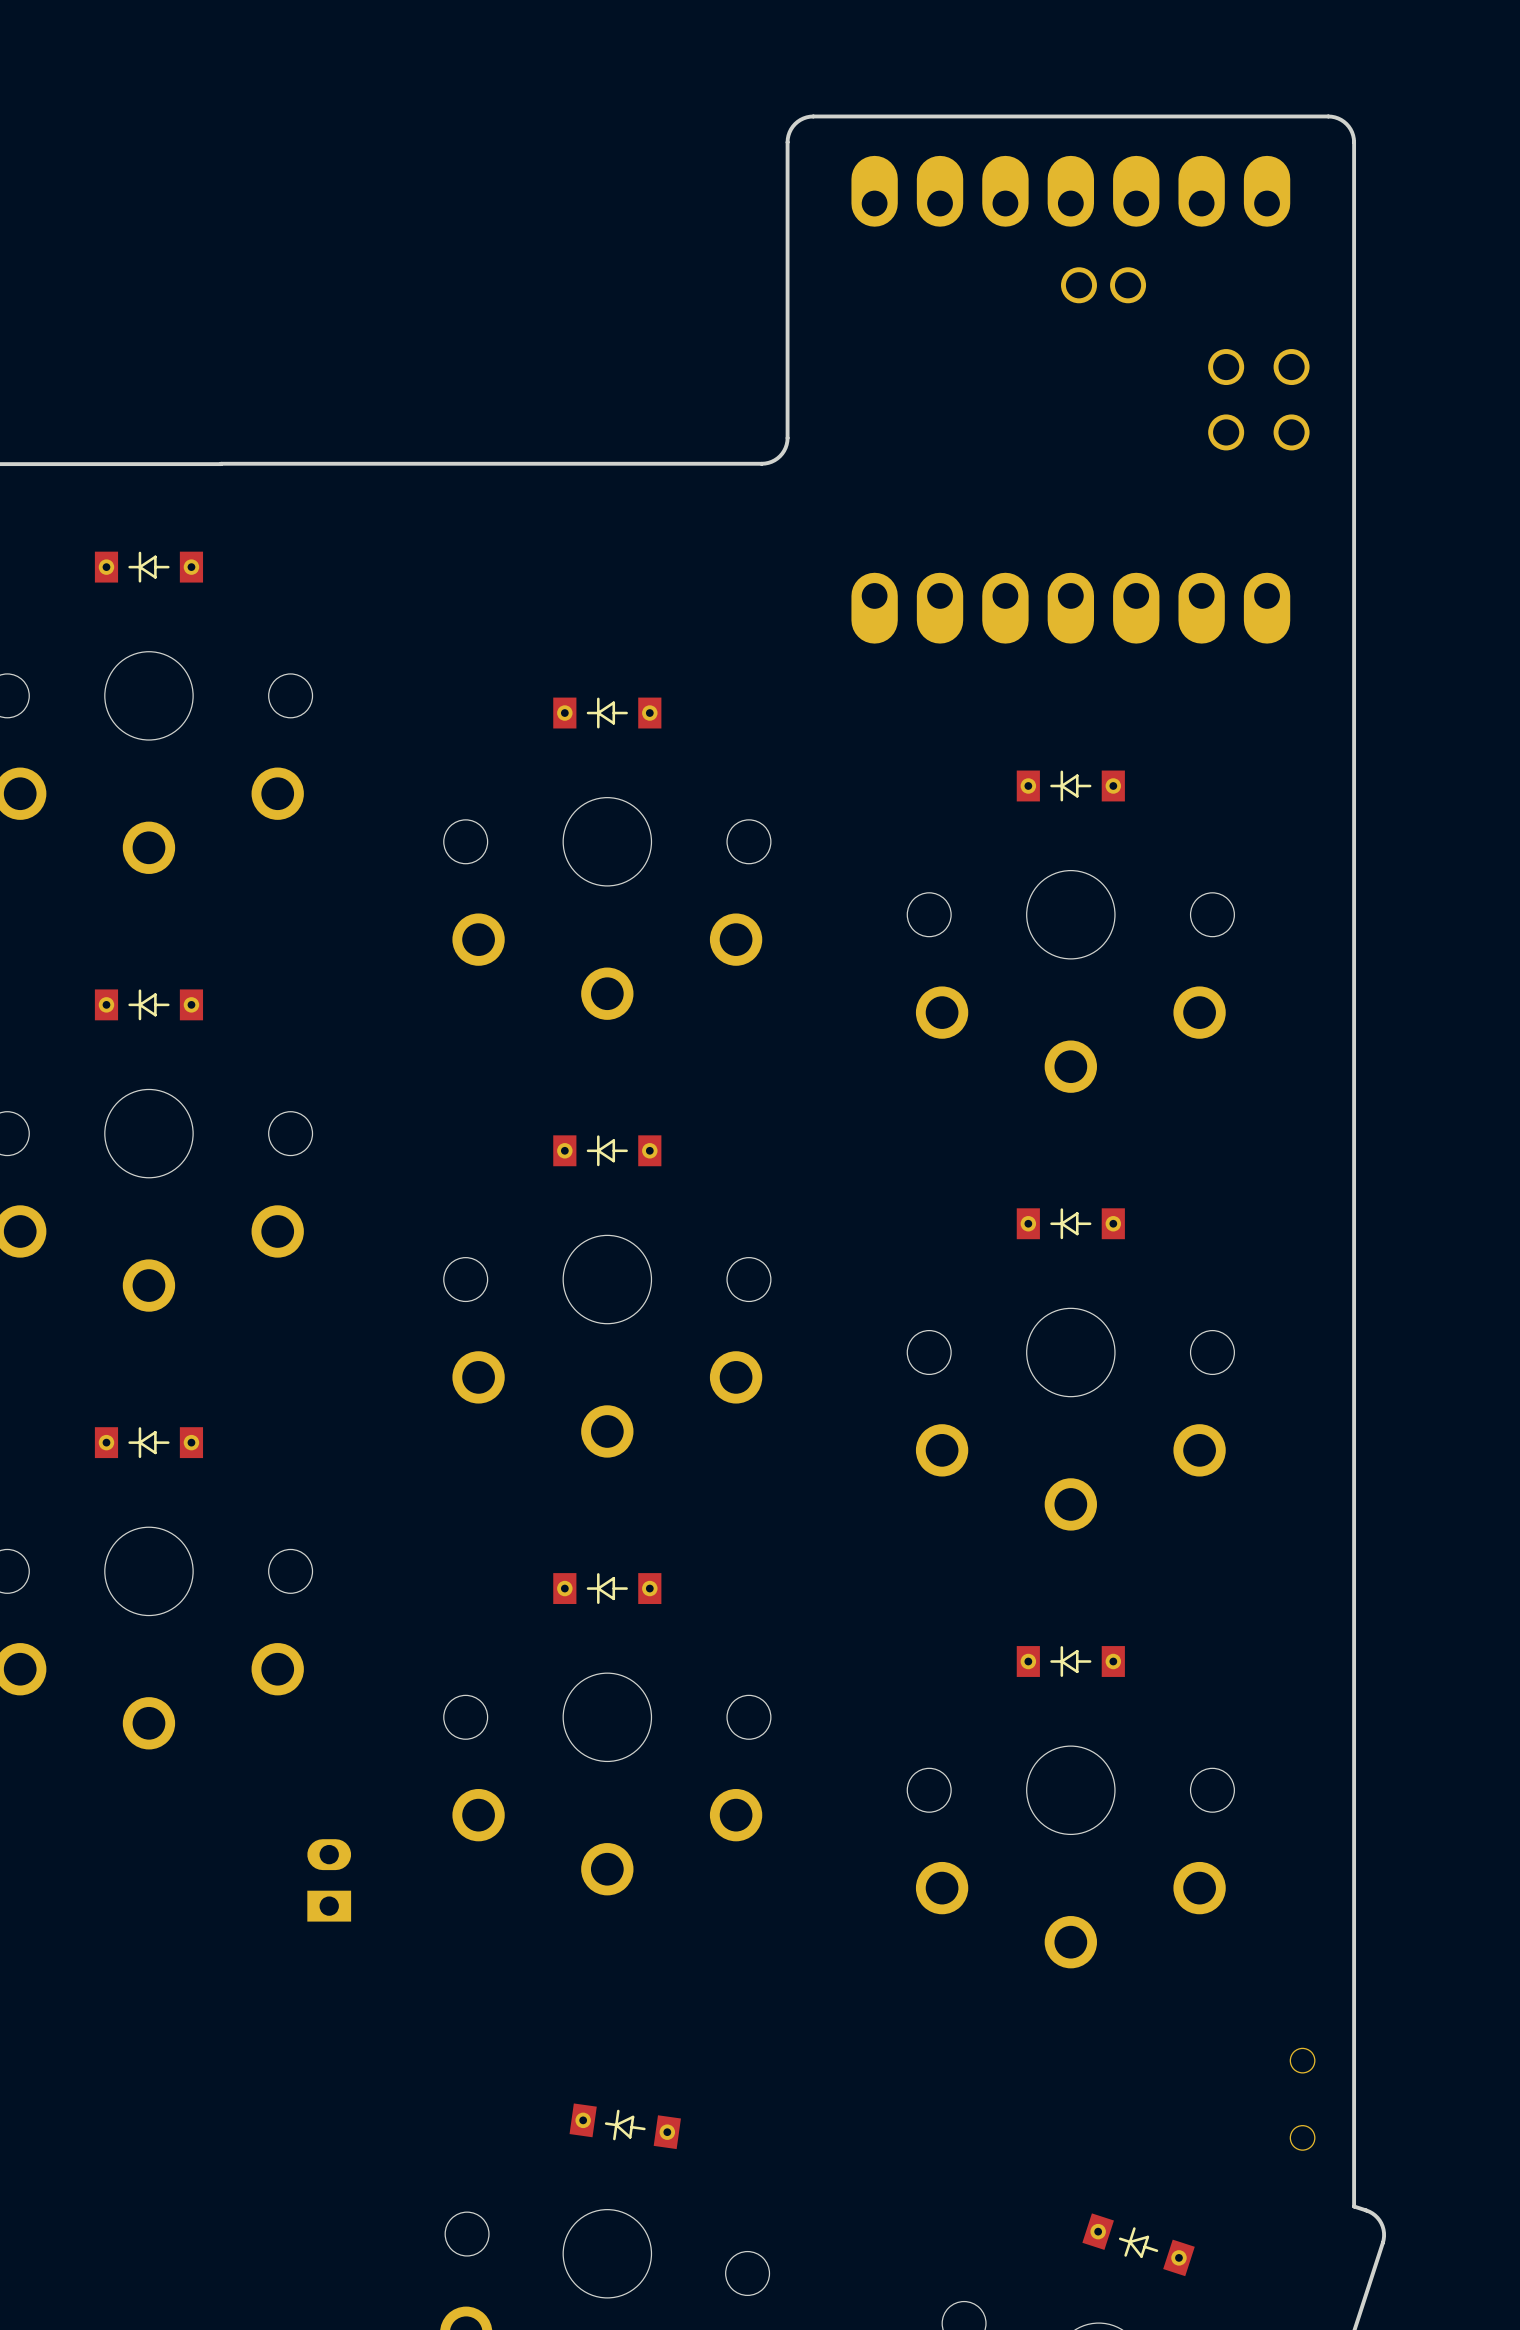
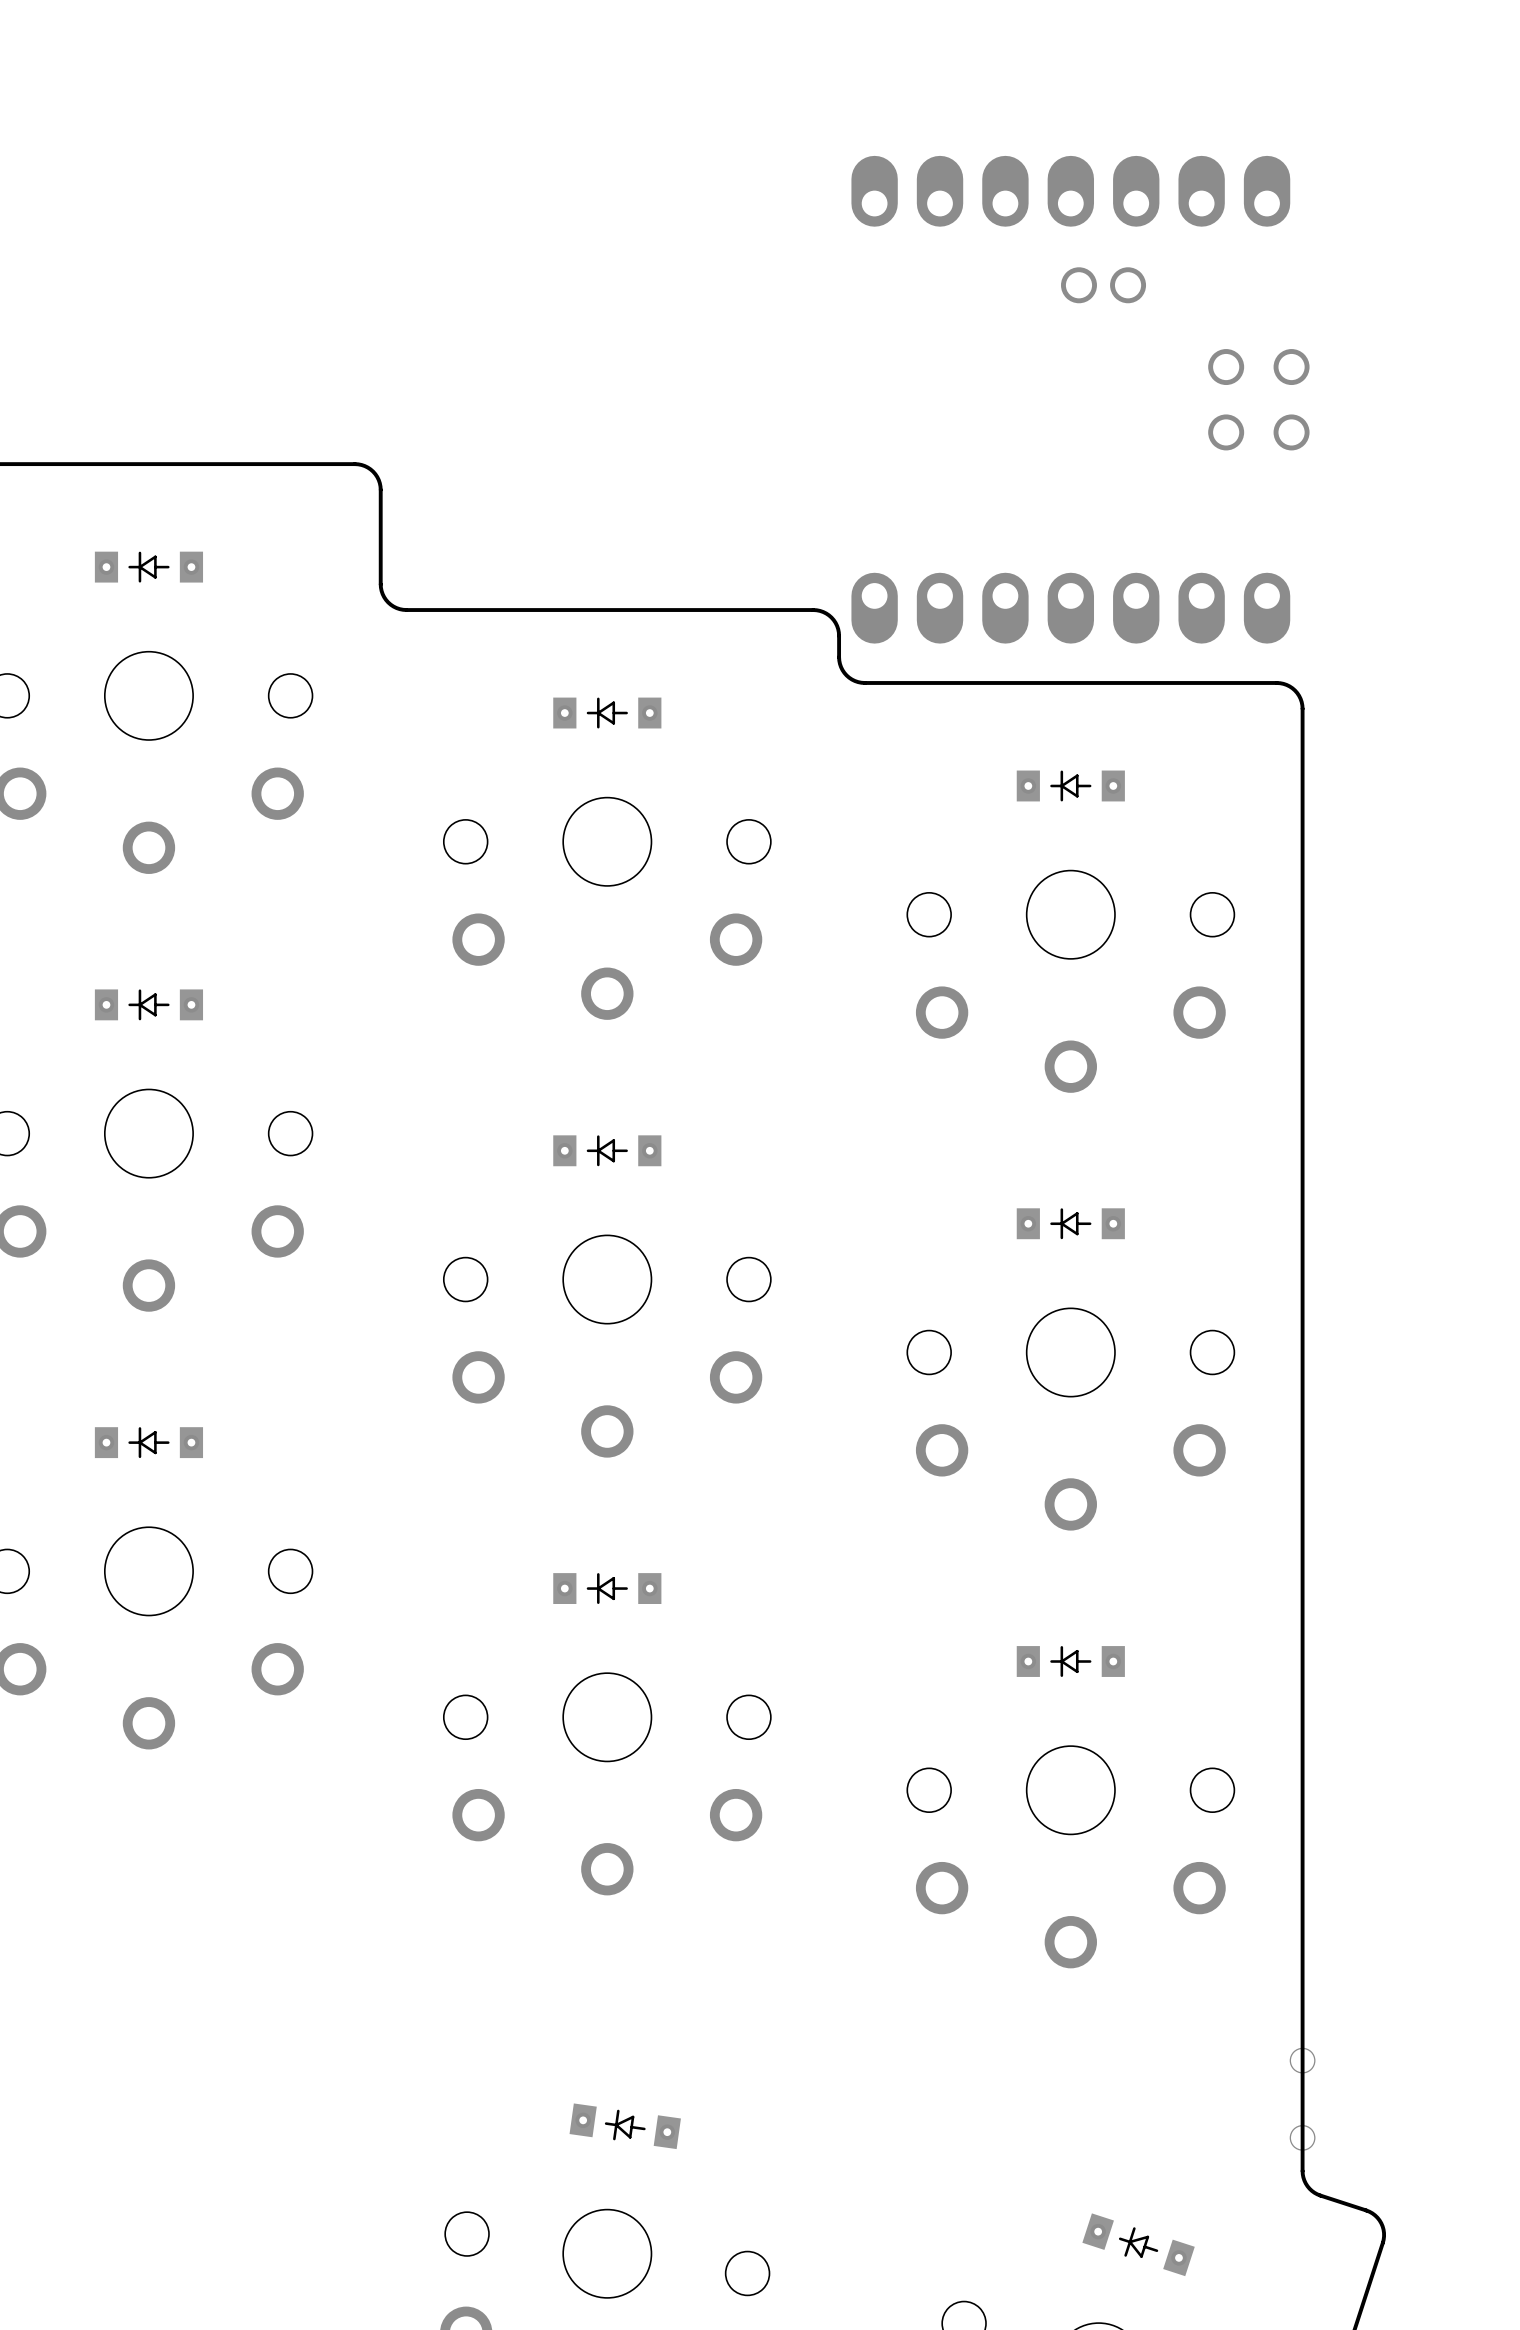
board edge: (221, 463) (761, 463) (774, 460) (784, 450) (787, 438) (787, 138) (795, 124) (806, 117) (1328, 116) (1341, 119) (1350, 129) (1354, 142) (1354, 2206) -> (221, 464) (354, 464) (370, 469) (377, 476) (380, 486) (381, 590) (388, 602) (399, 609) (816, 610) (826, 613) (835, 622) (838, 632) (841, 667) (849, 677) (861, 682) (1276, 682) (1289, 686) (1299, 695) (1302, 708) (1302, 2171) (1305, 2183) (1314, 2192) (1354, 2206)
part: (329, 1880) -> none

